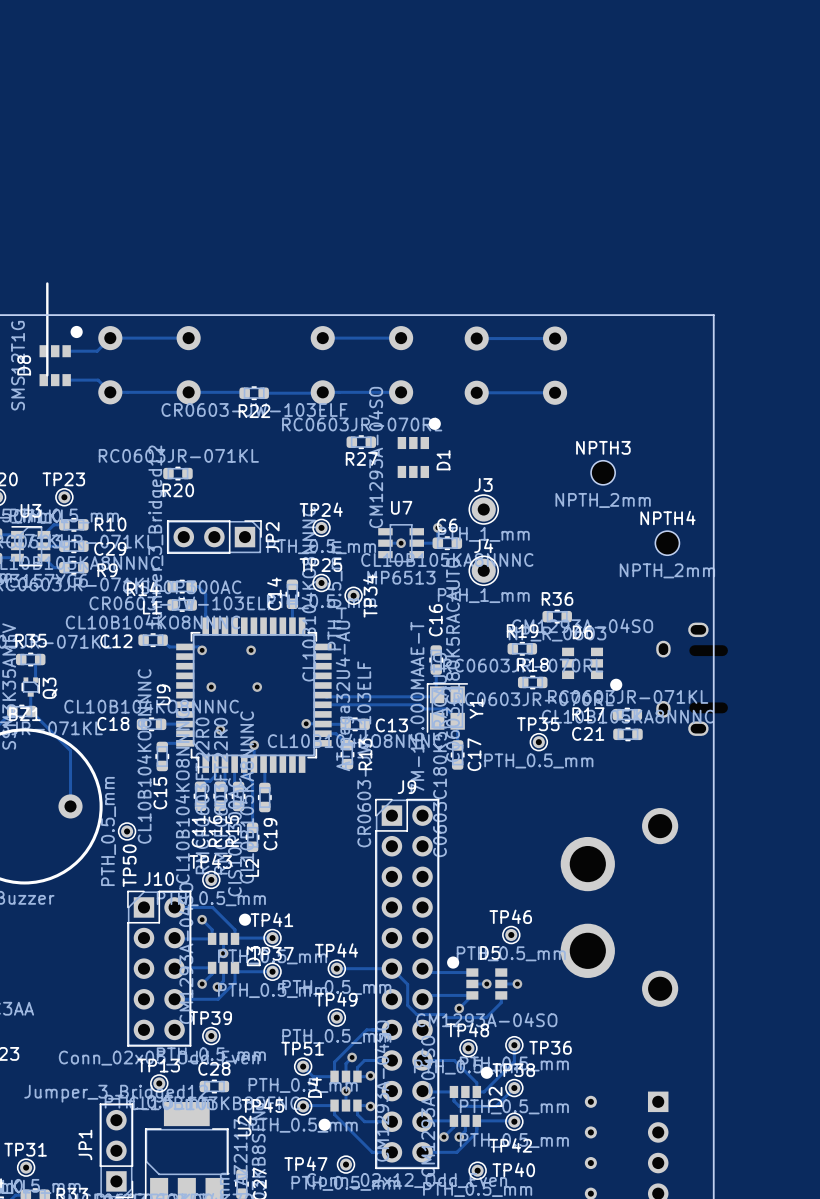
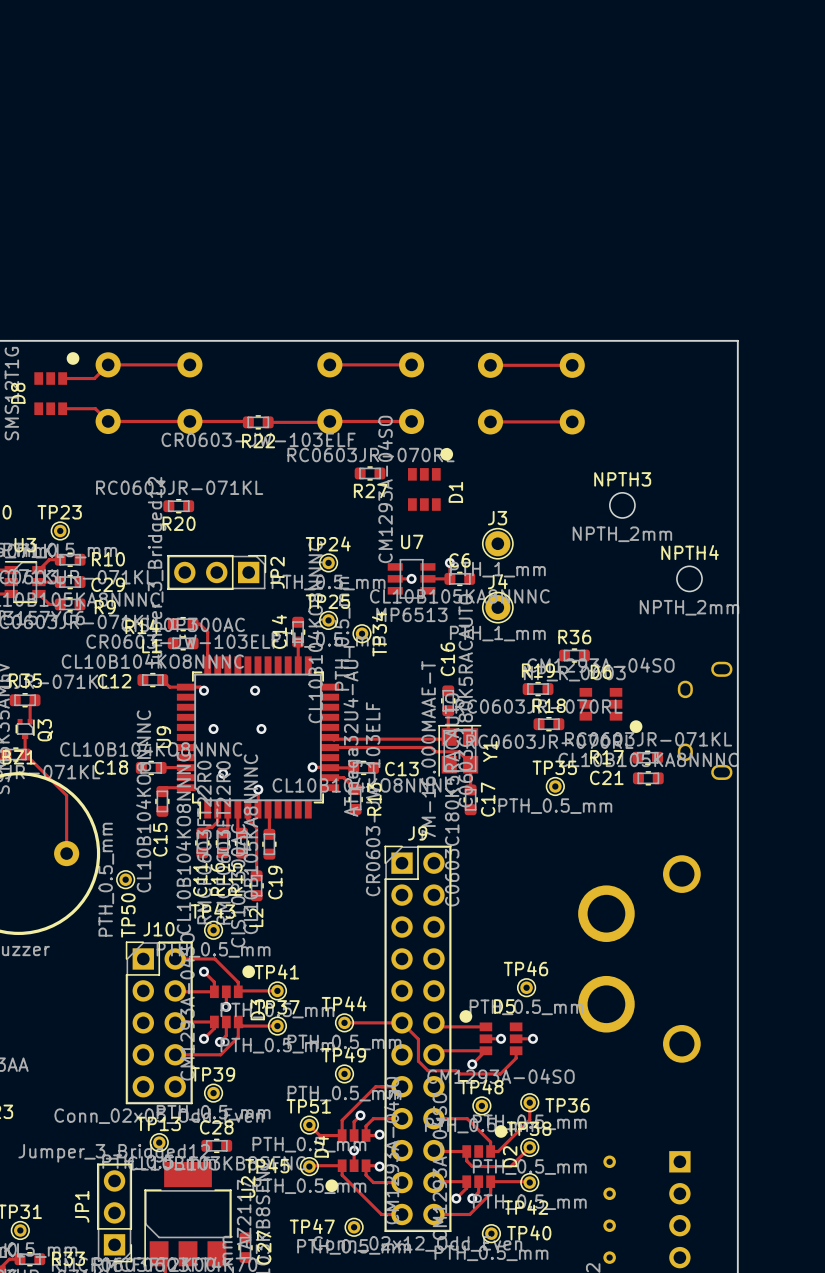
line: (47, 283) (47, 375) -> none

